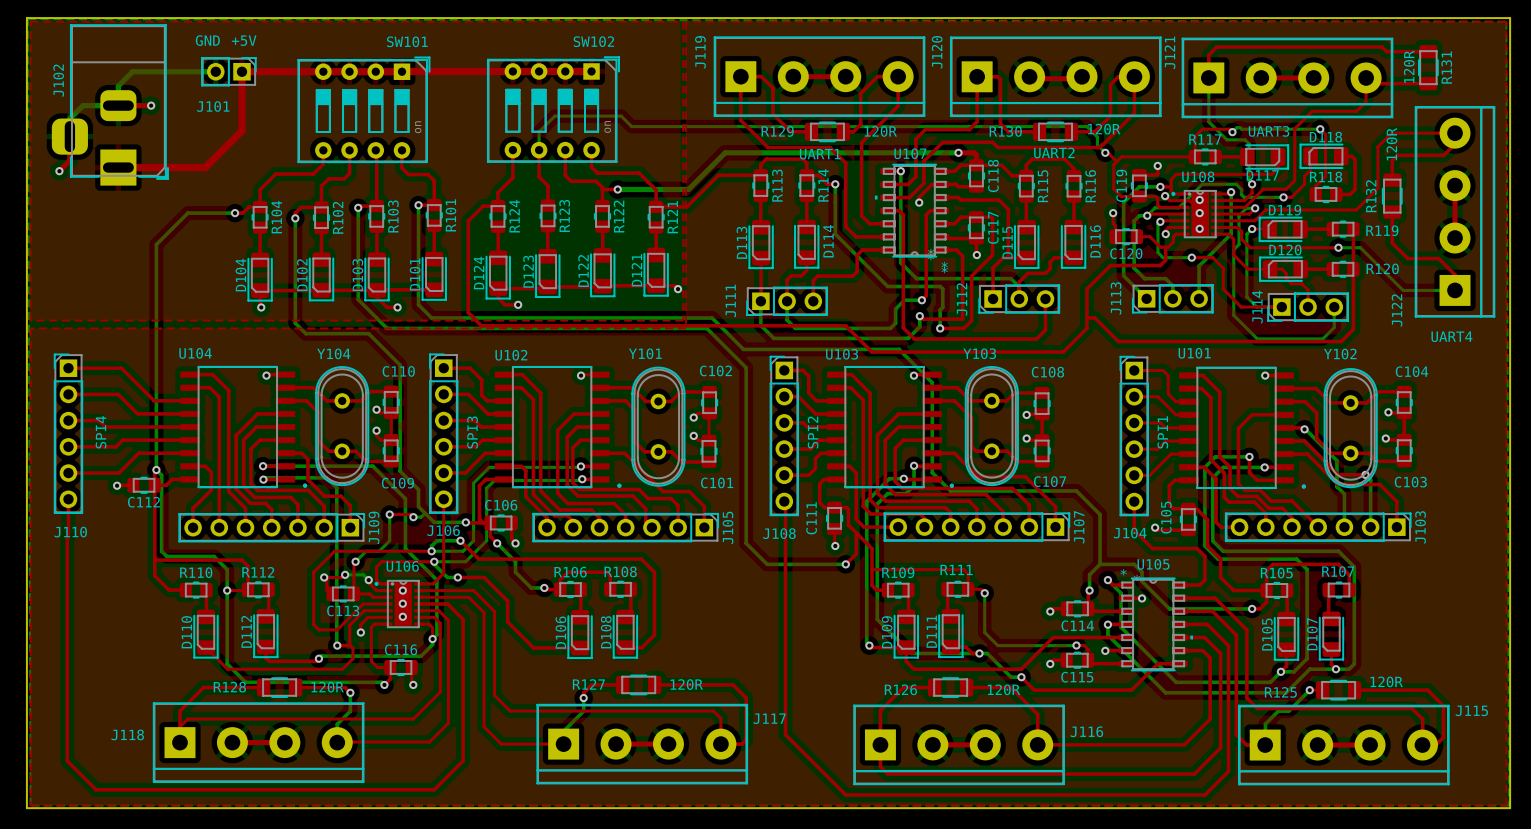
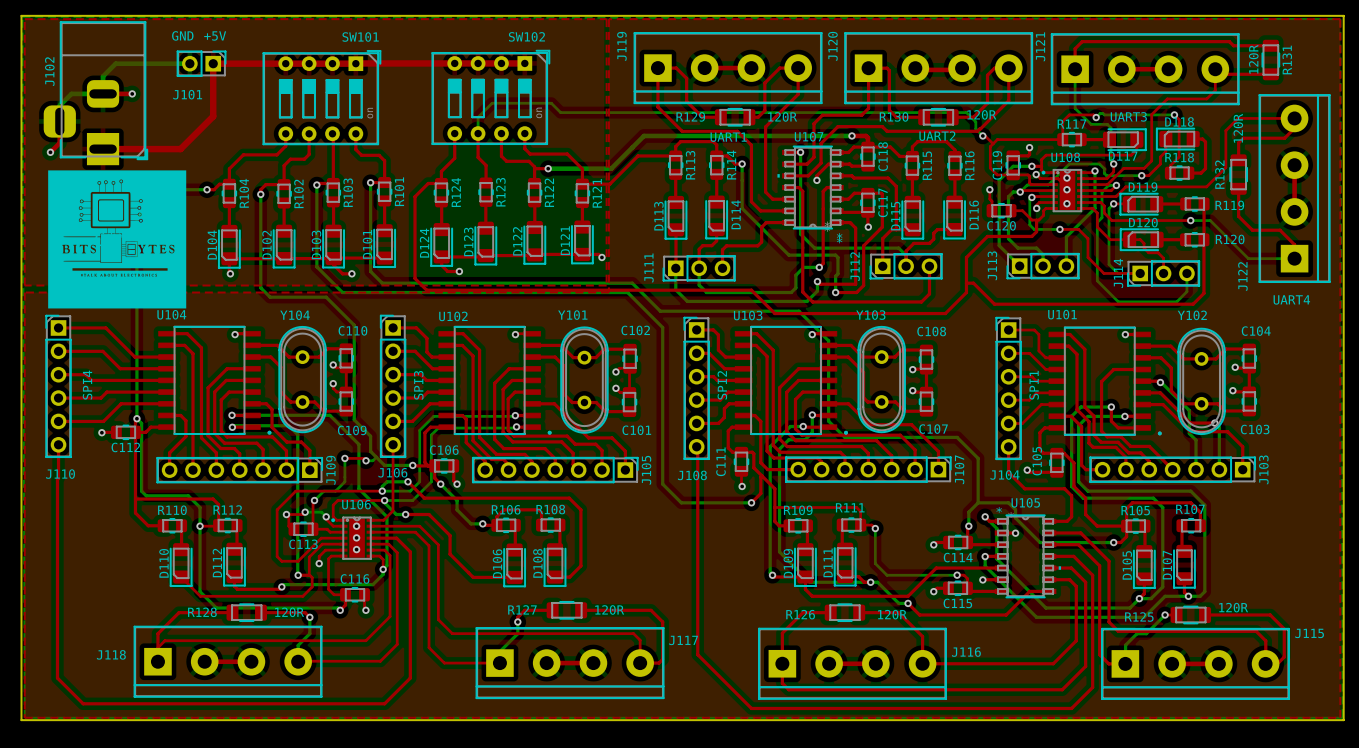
part: none -> (117, 239)

